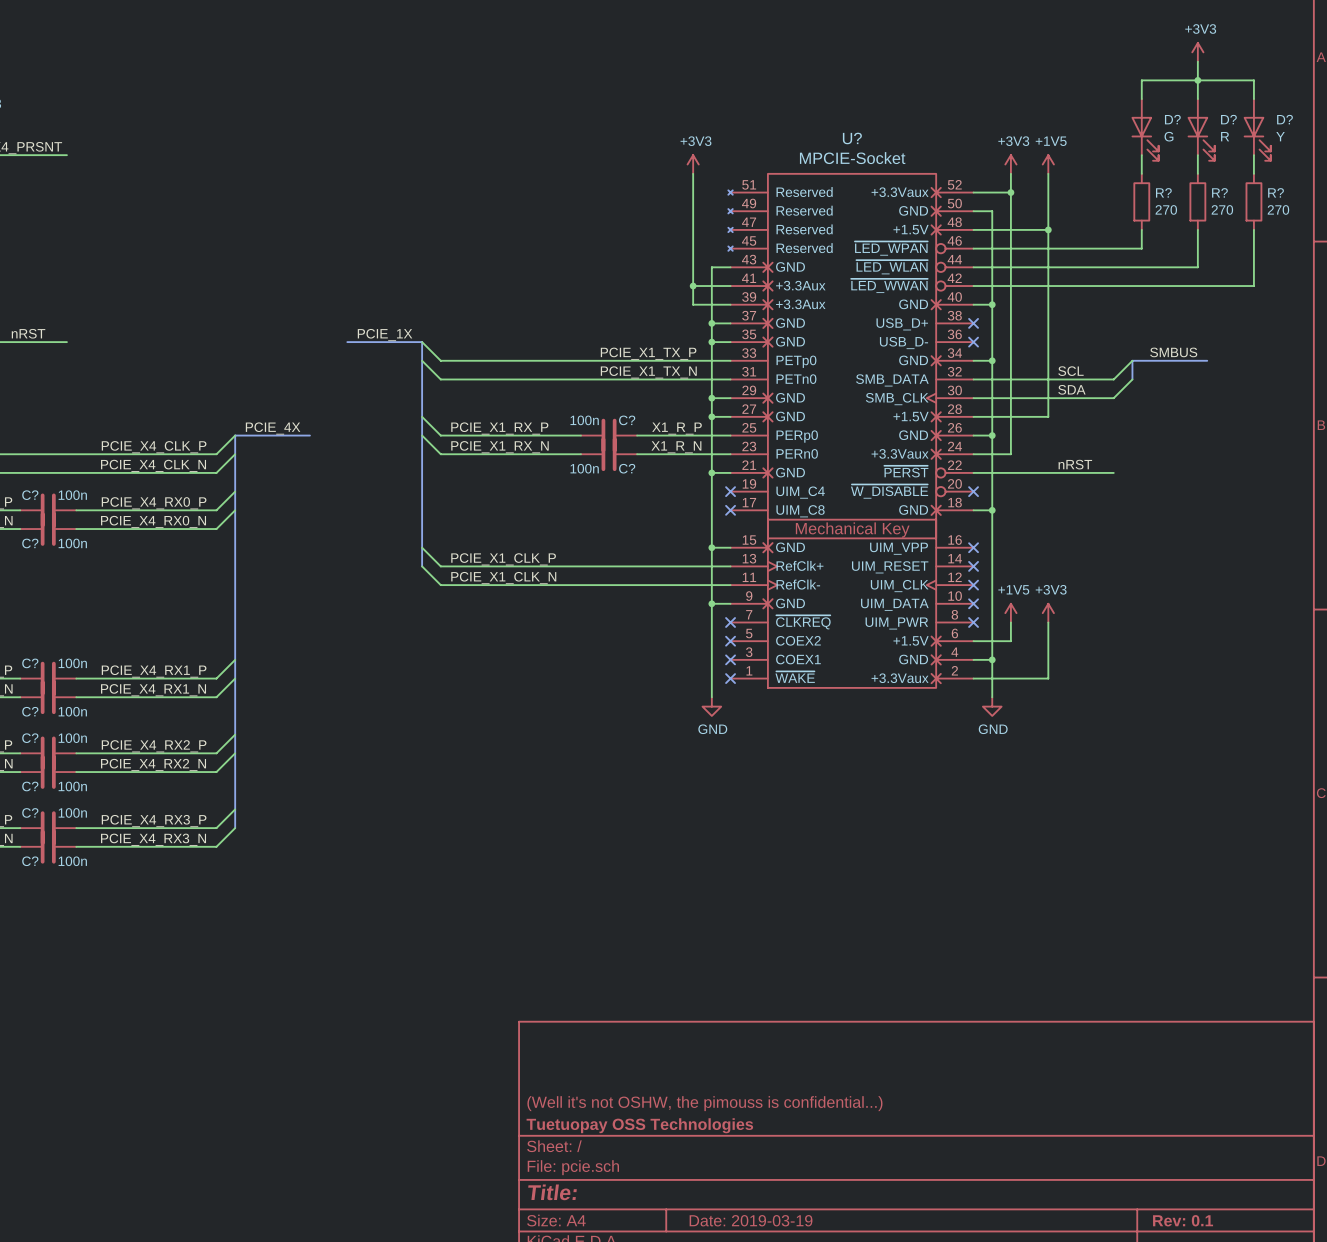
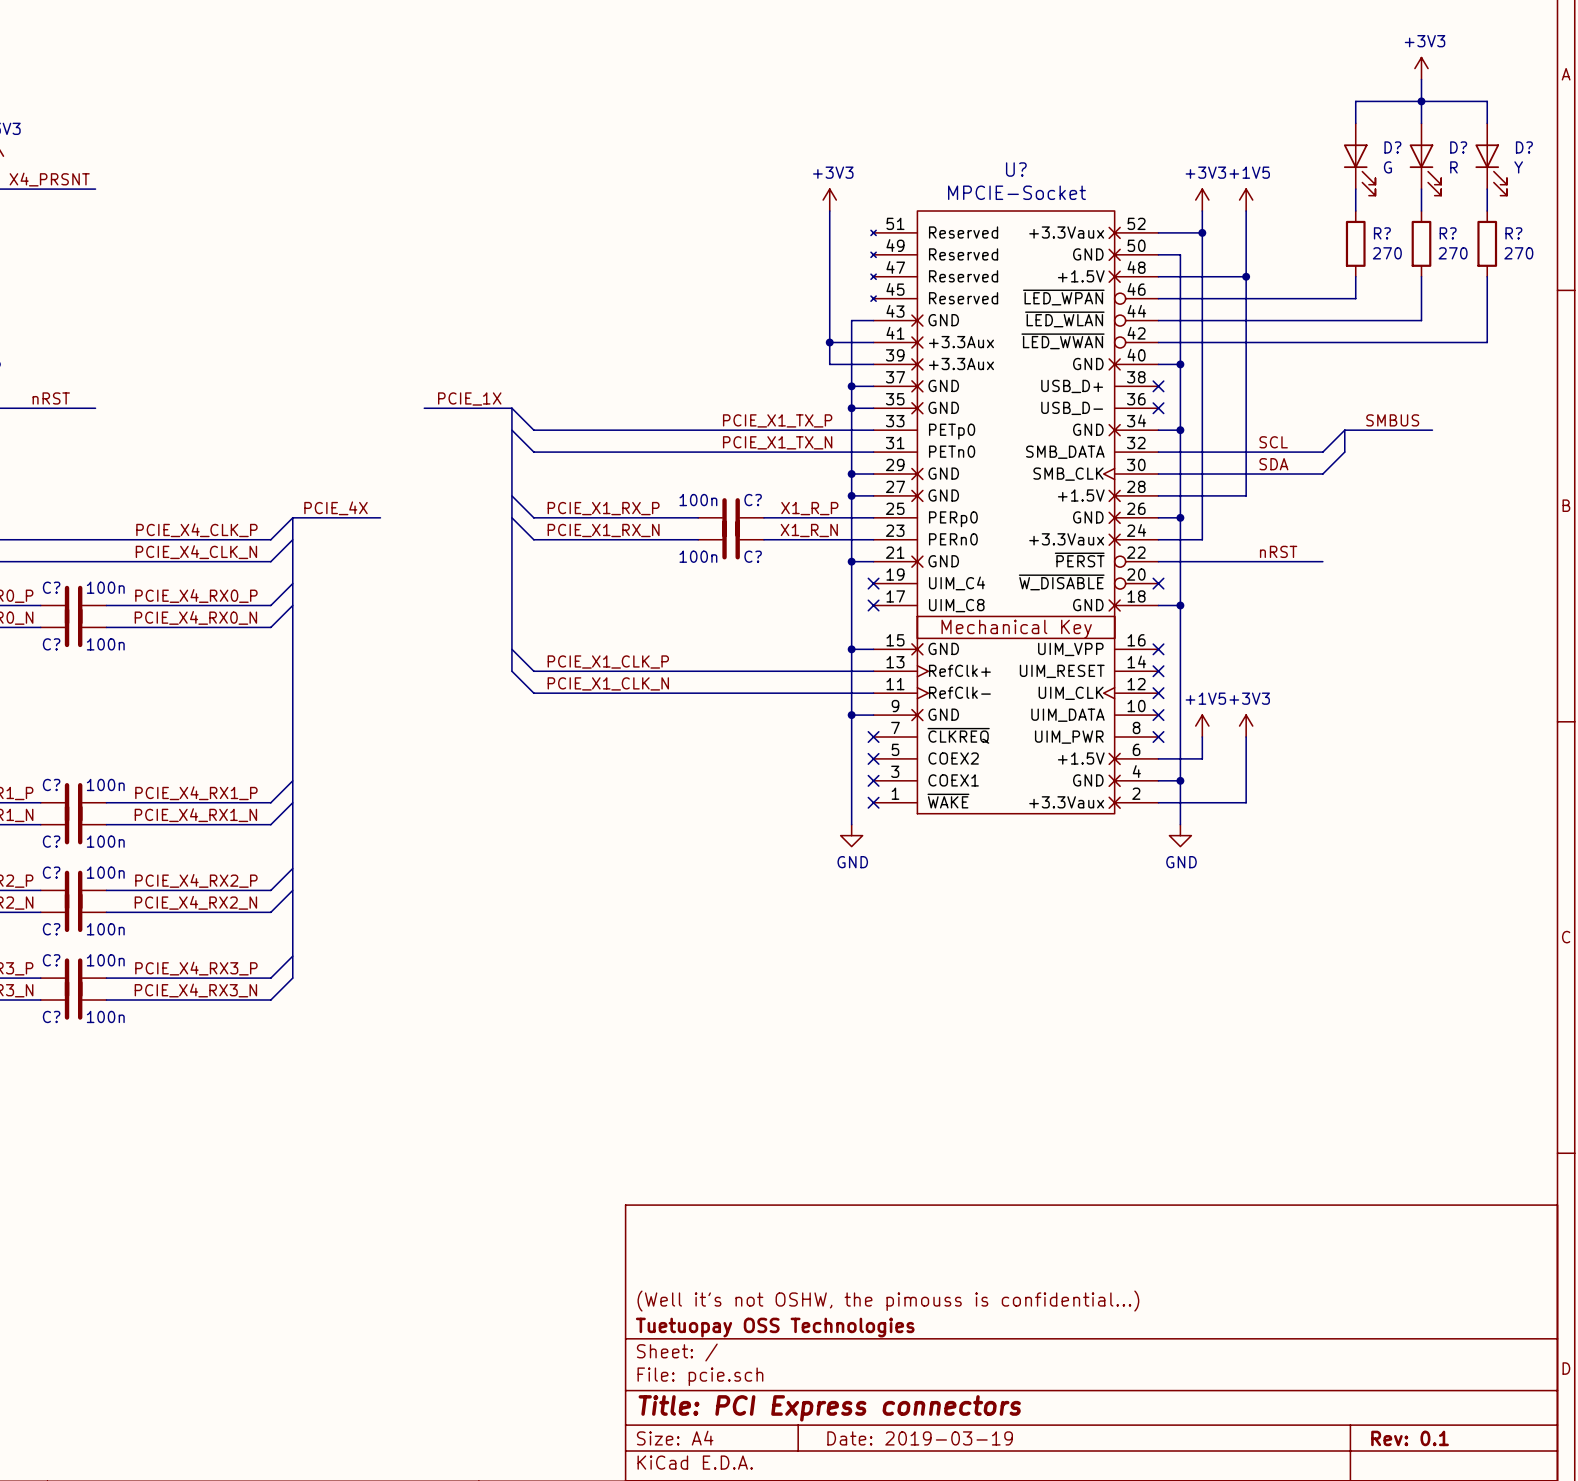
title block: Title: (552, 1192) -> Title: PCI Express connectors (829, 1408)

